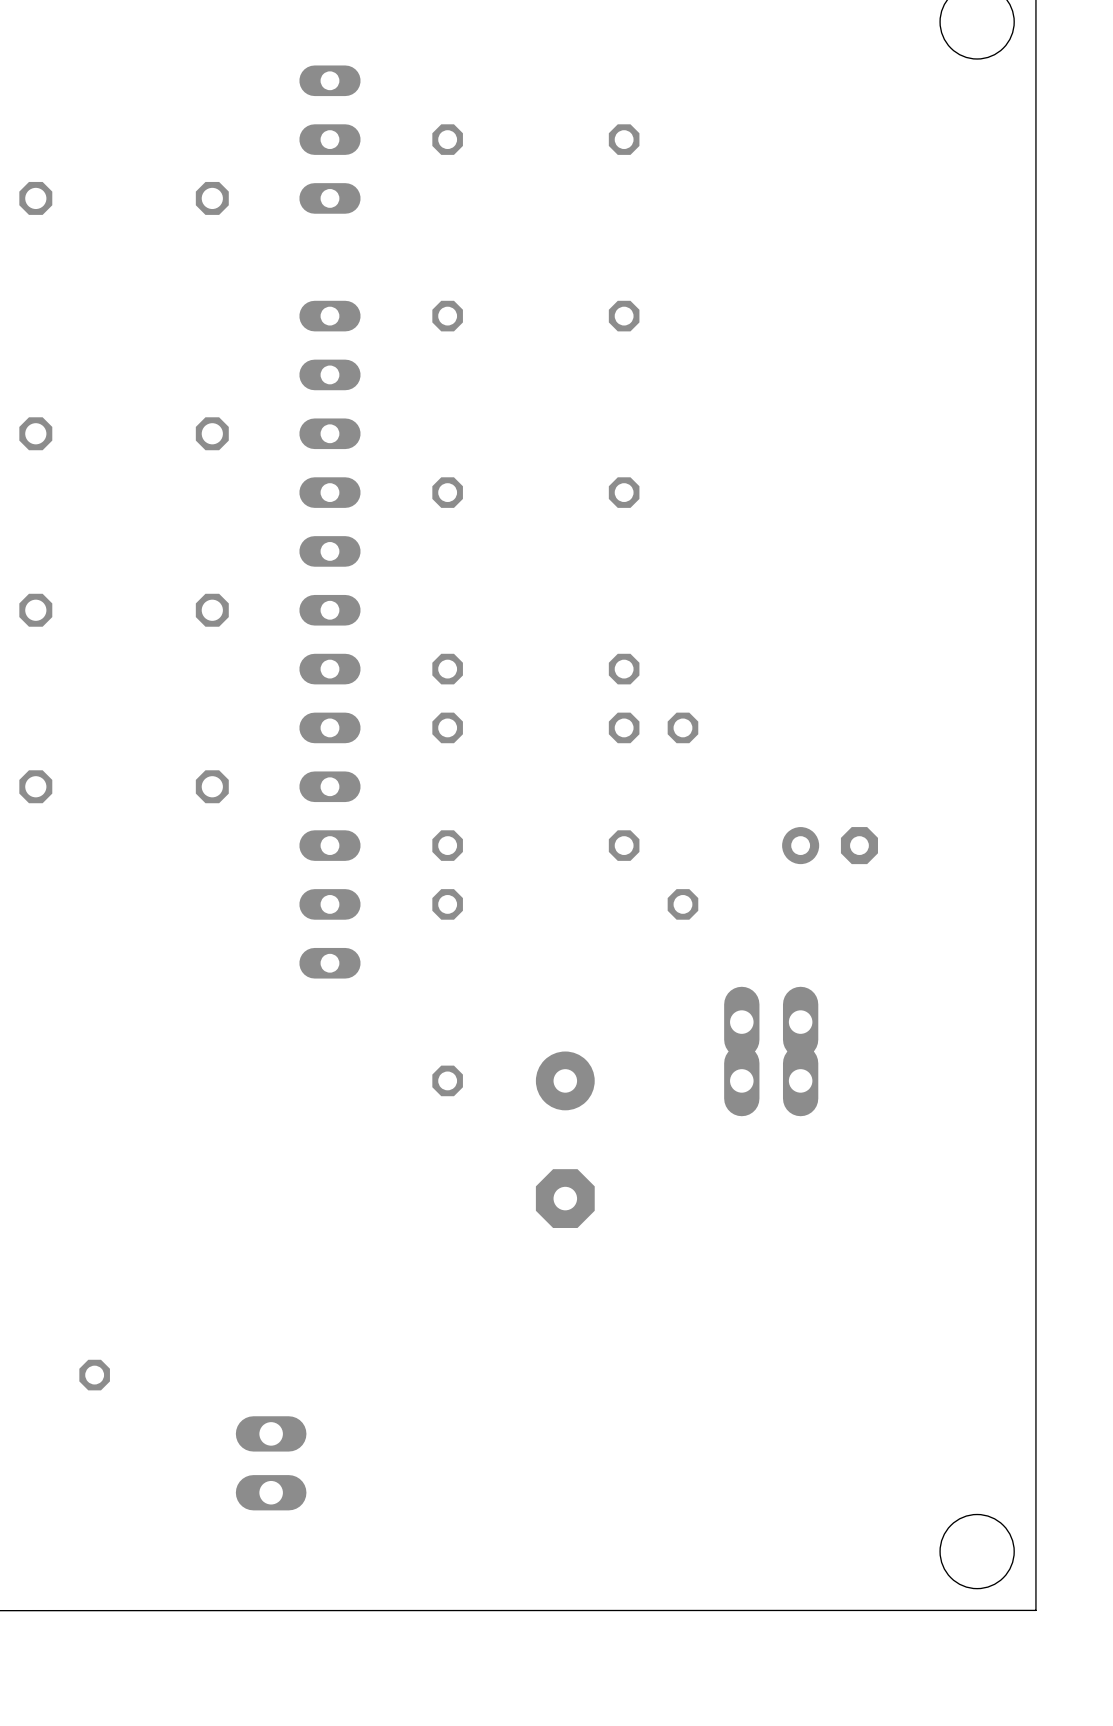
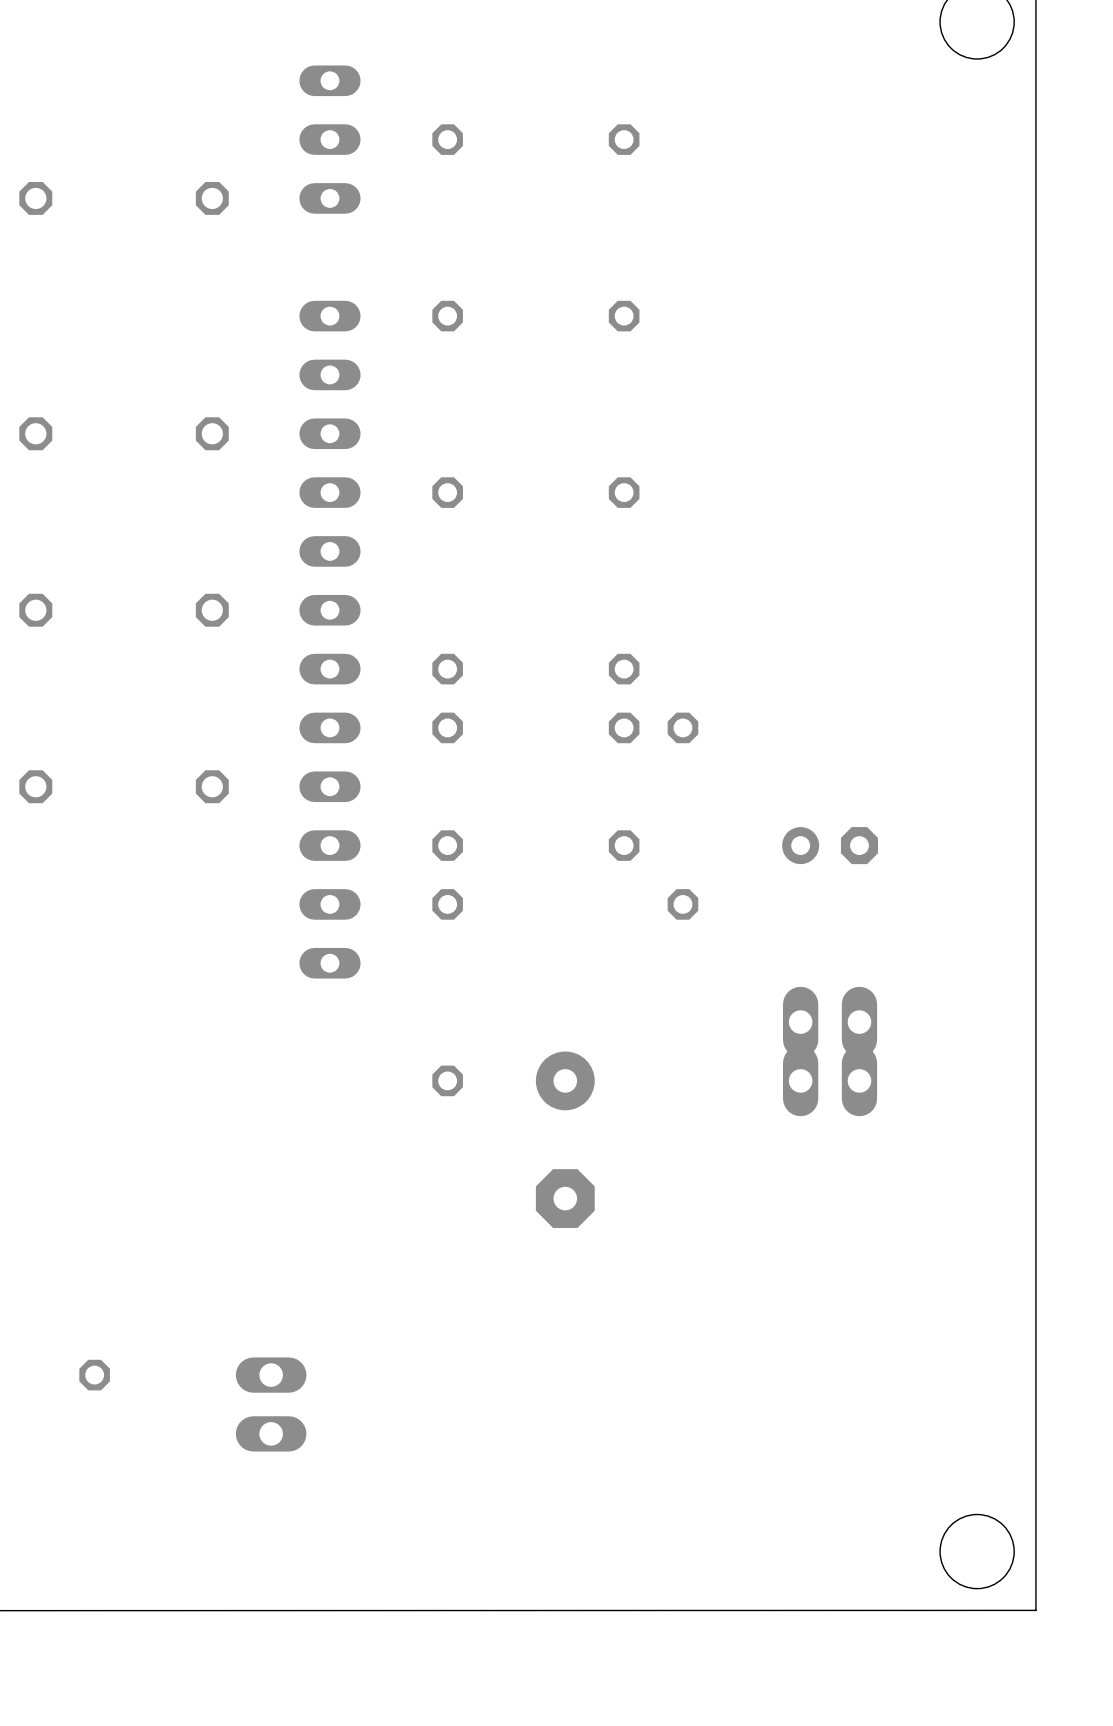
part: (771, 1022) -> none
part: none -> (830, 1022)
part: (771, 1080) -> none
part: none -> (830, 1080)
part position: (271, 1463) -> (271, 1404)

